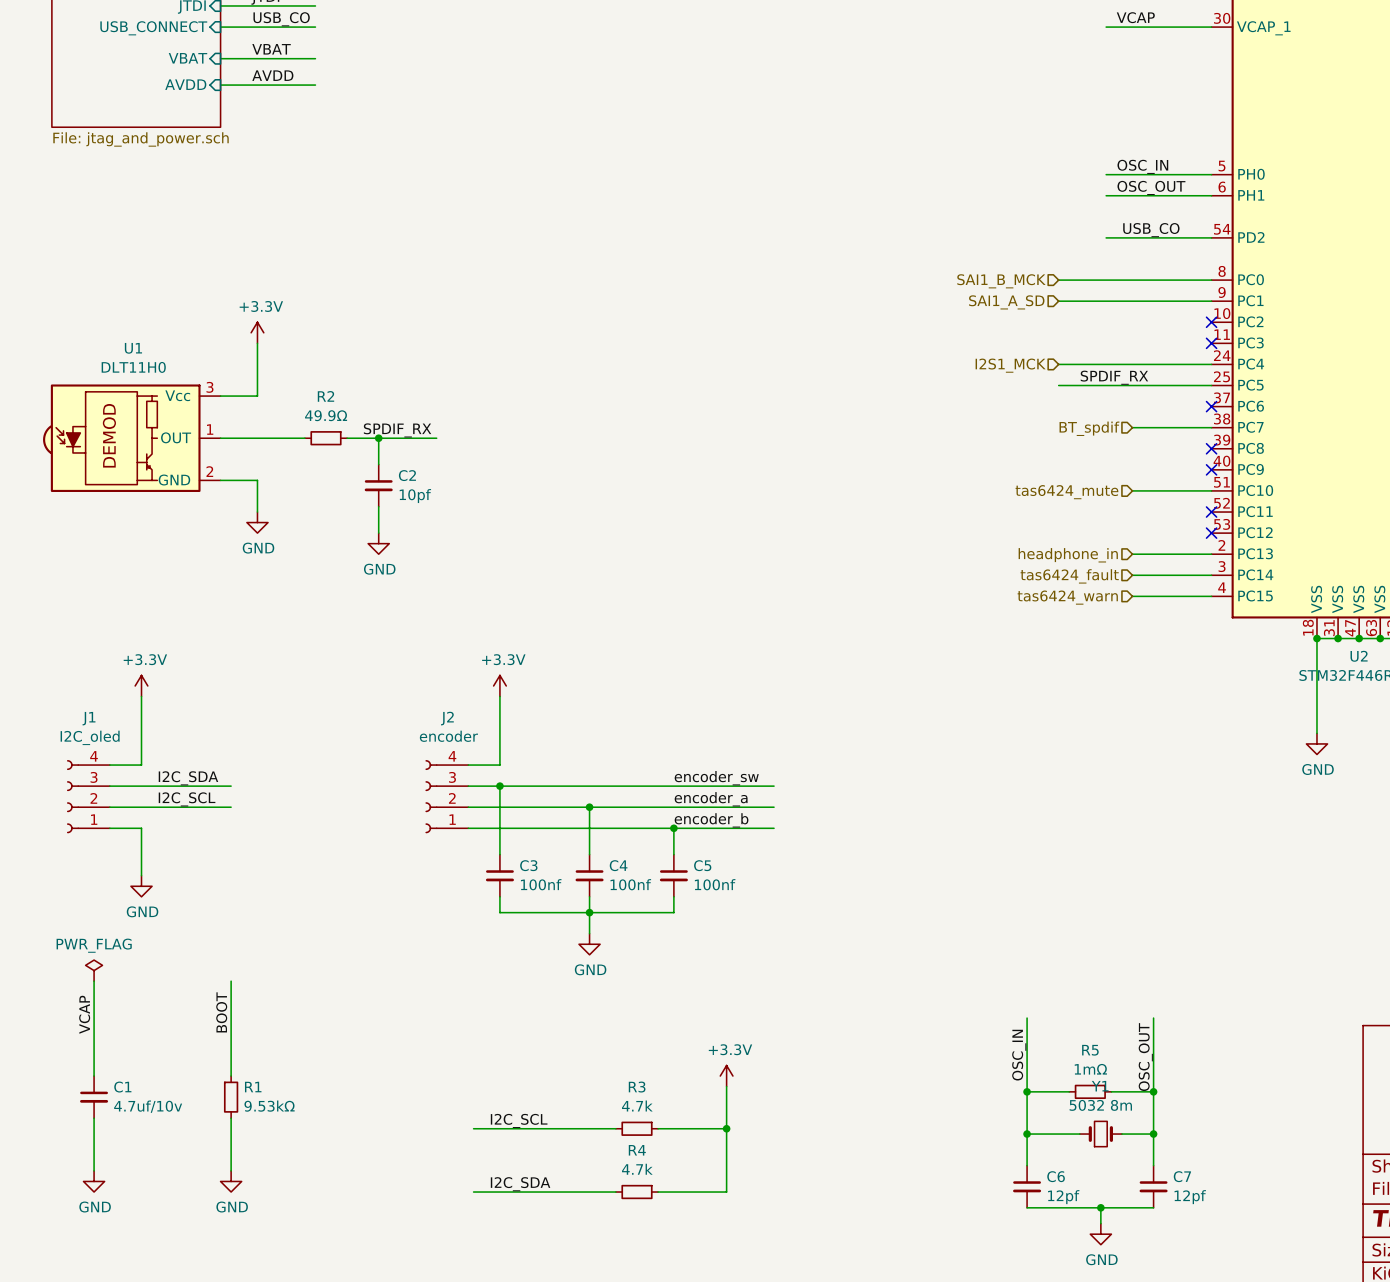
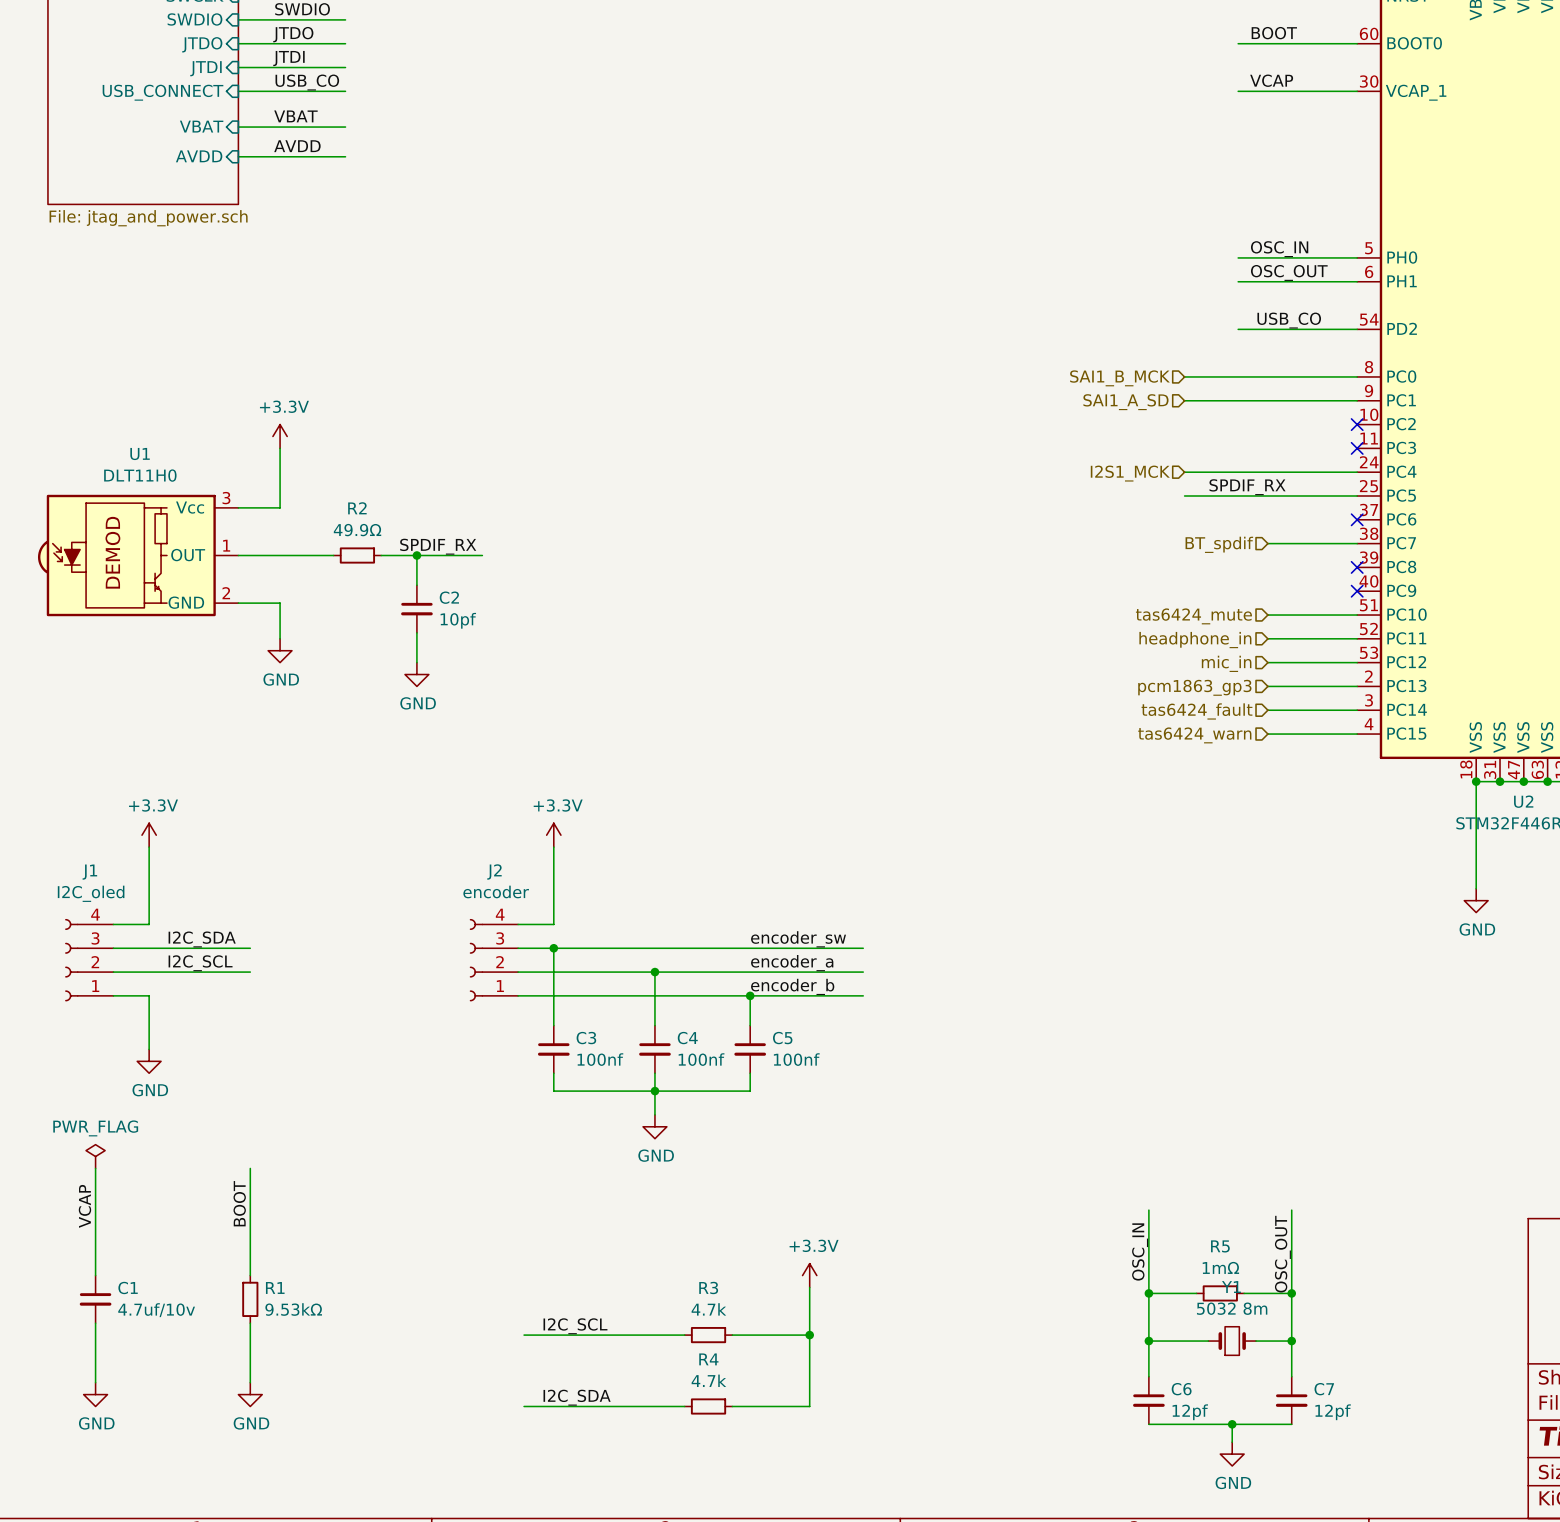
wire: none -> (1267, 638) (1357, 638)
no-connect mark: (1211, 512) -> none
hierarchical label: none -> headphone_in (1195, 640)
wire: none -> (1267, 662) (1357, 662)
no-connect mark: (1211, 533) -> none
hierarchical label: none -> mic_in (1226, 663)
hierarchical label: headphone_in (1068, 555) -> pcm1863_gp3 (1194, 687)

